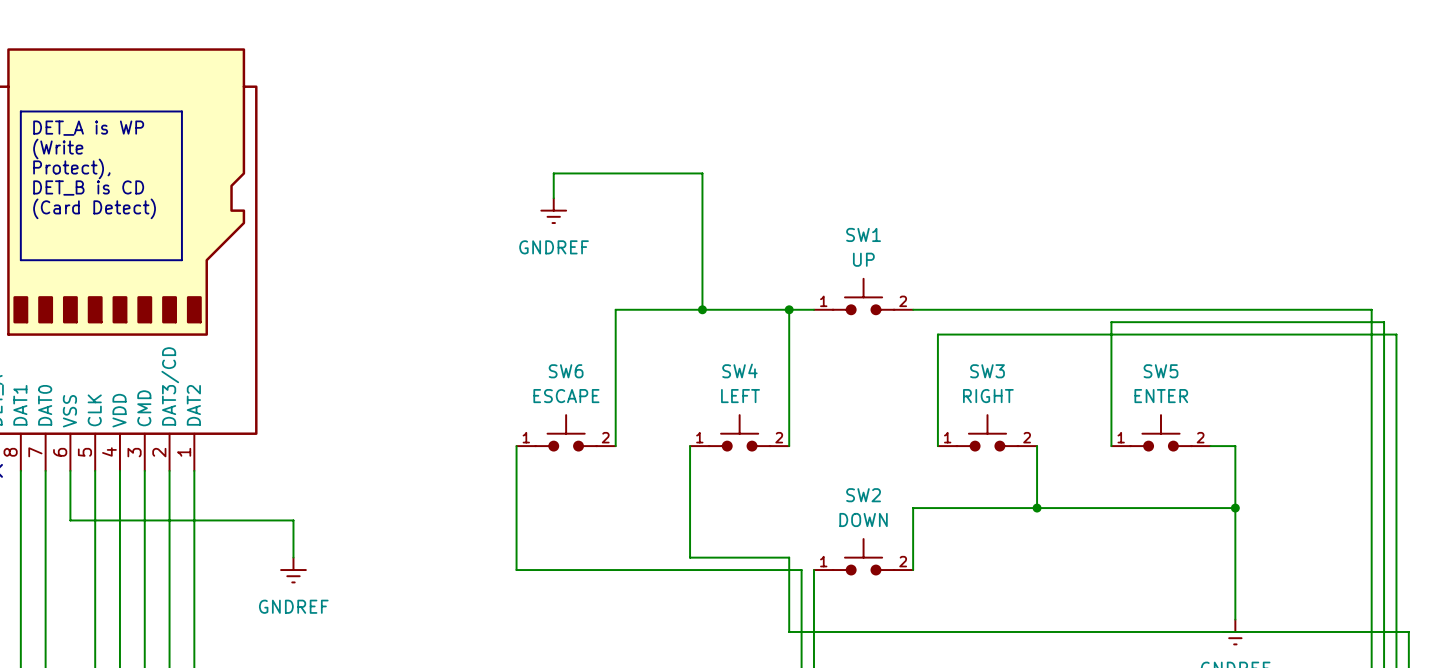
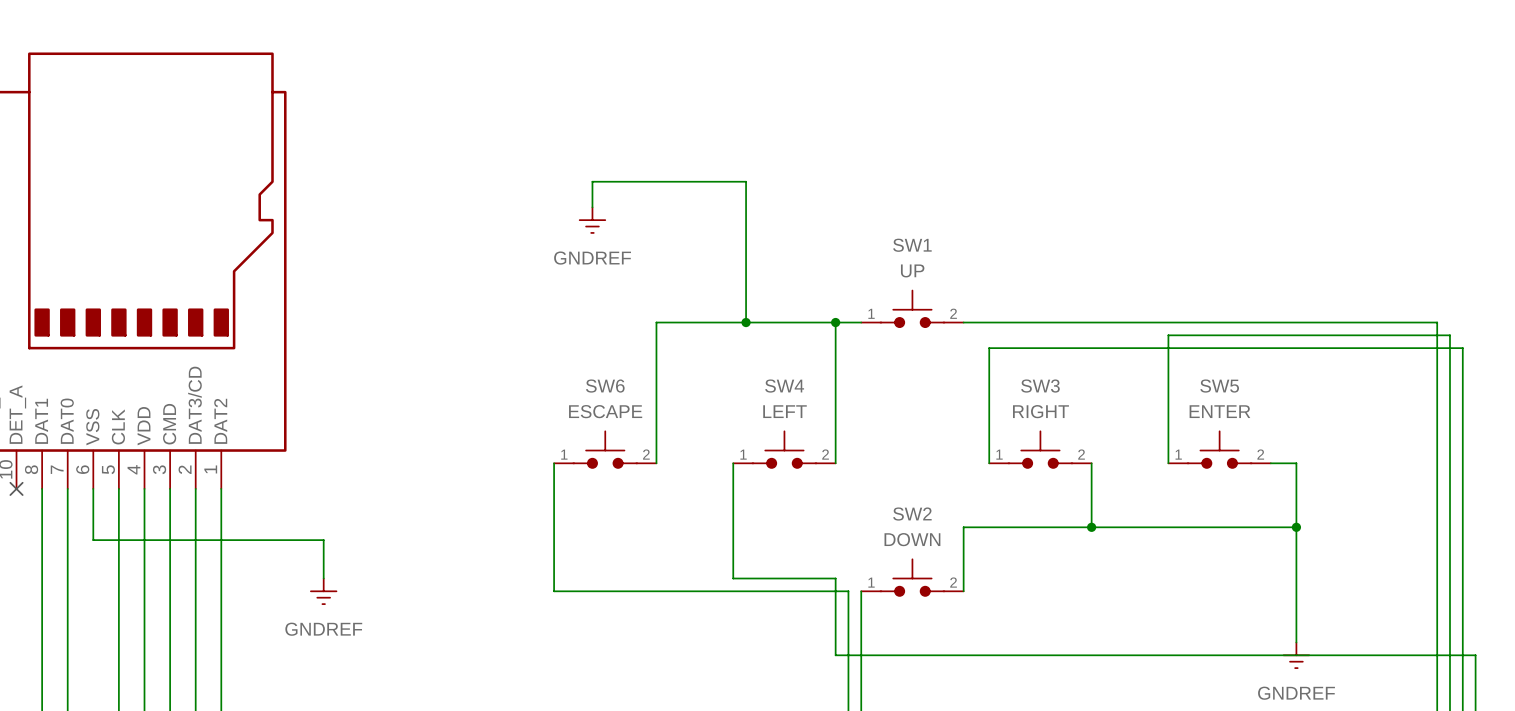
line: (20, 111) (181, 111) (181, 260) (20, 260) (20, 111) -> none
text: DET_A is WP (88, 128) -> none
text: (Write (58, 148) -> none
text: Protect), (71, 168) -> none
text: DET_B is CD (88, 188) -> none
text: (Card Detect) (94, 208) -> none

